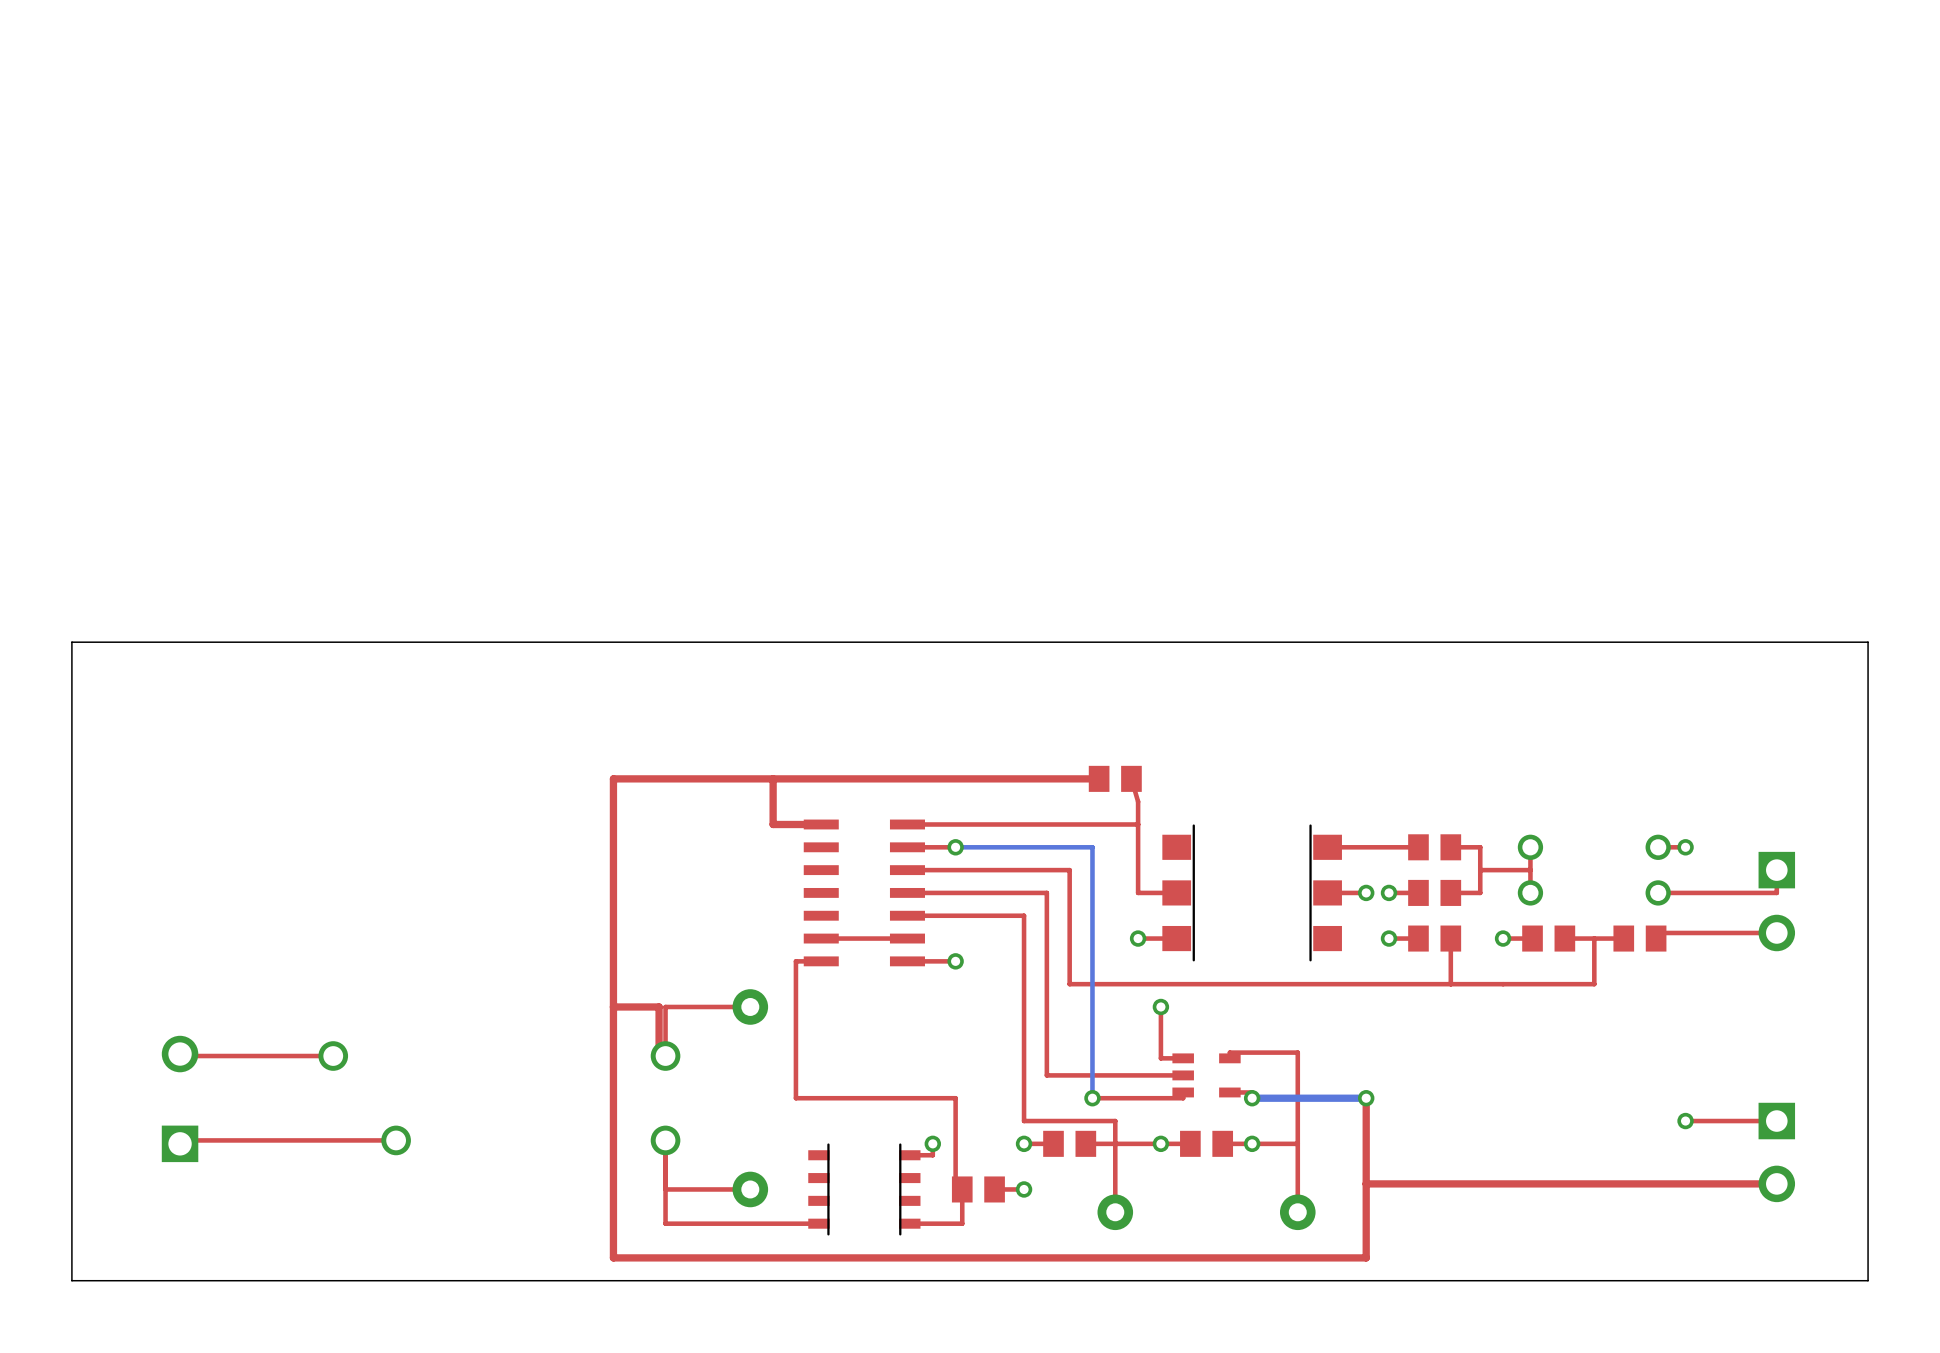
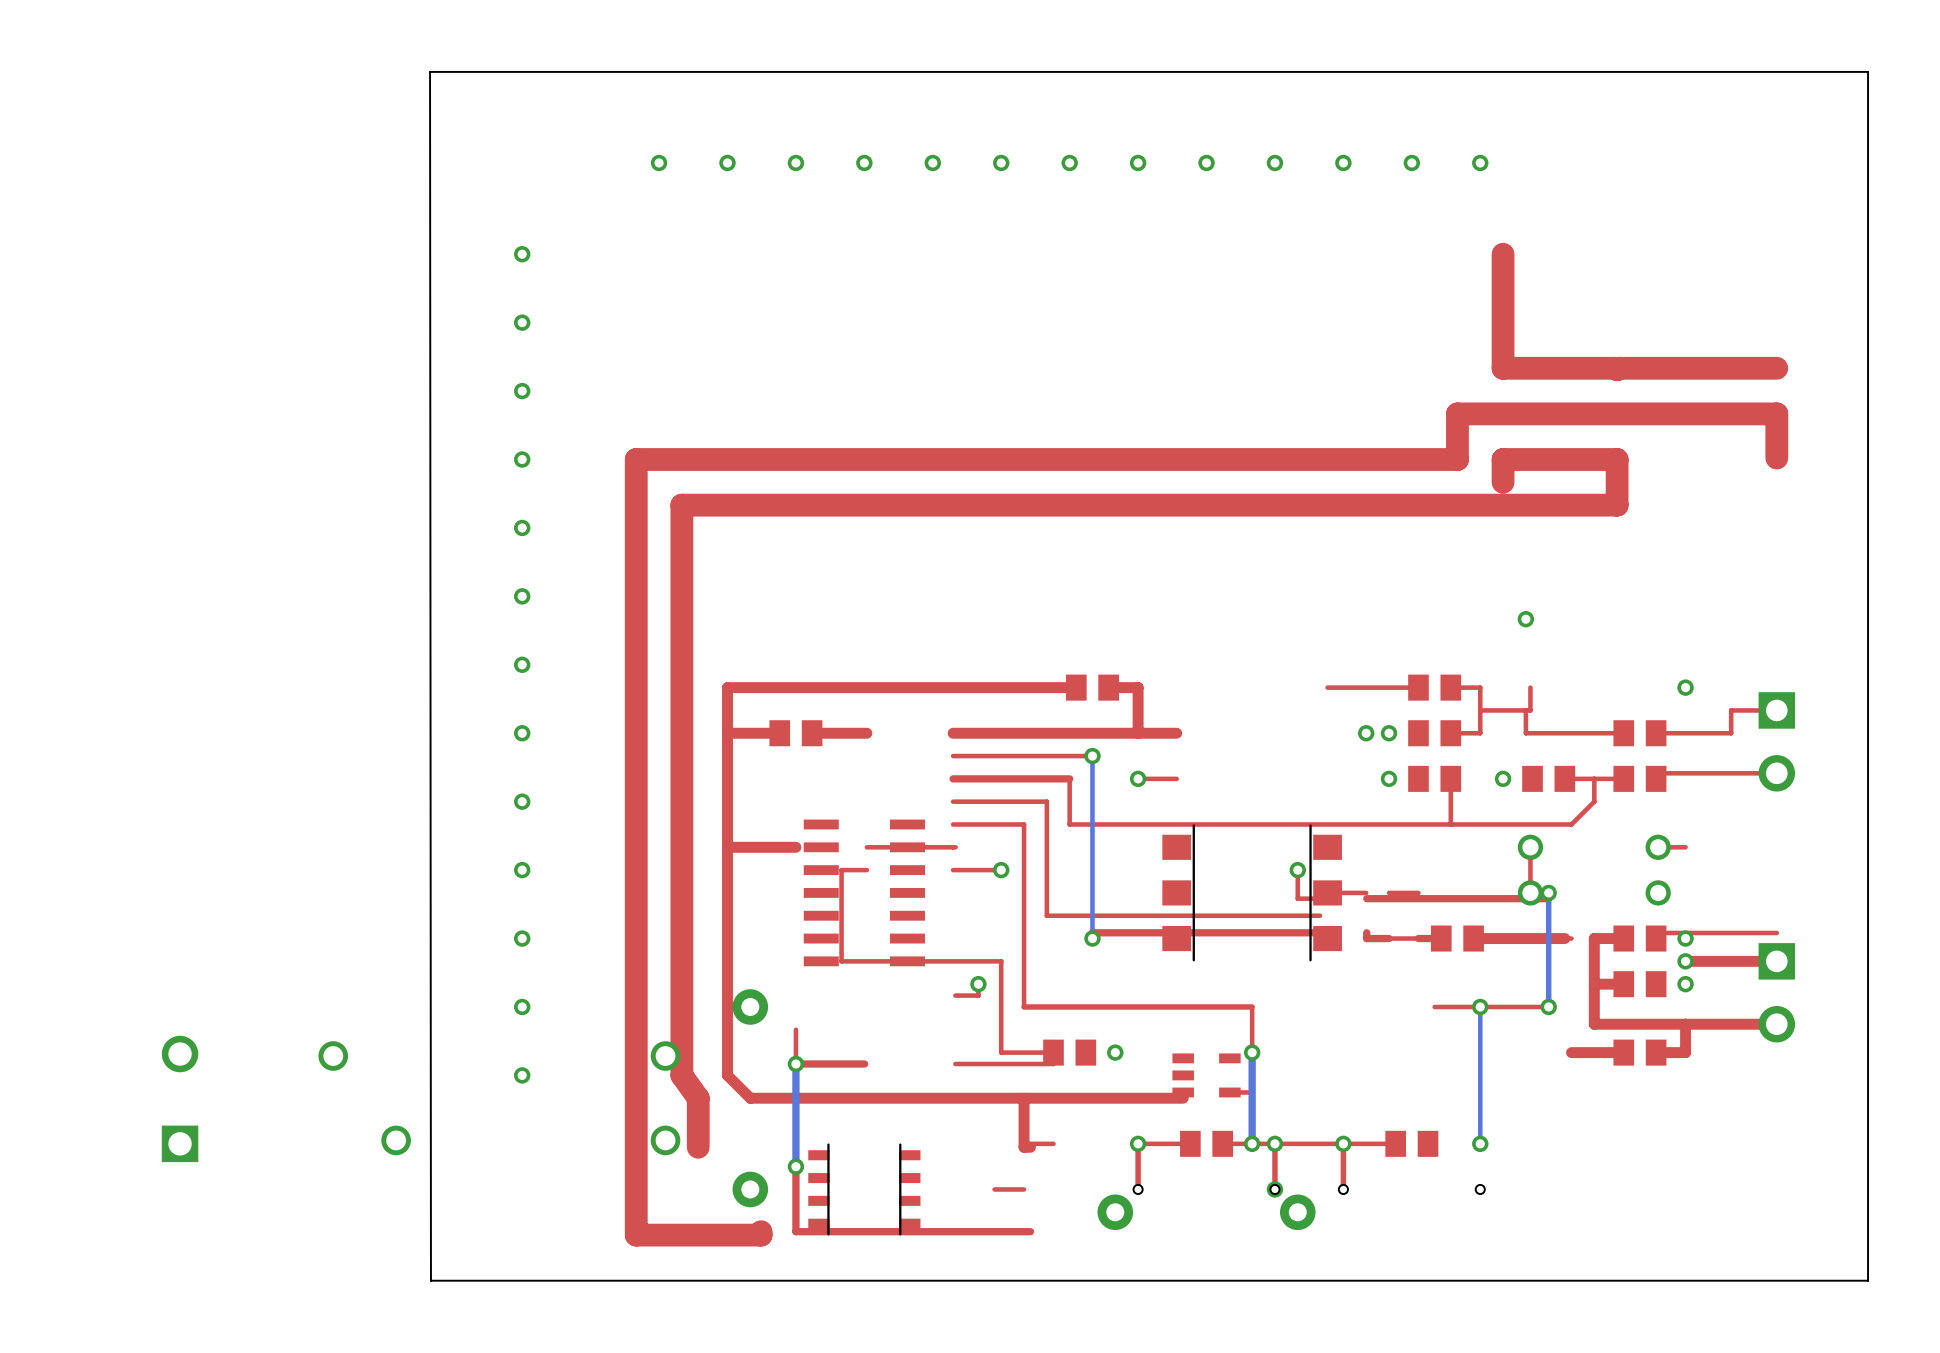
via: none -> (659, 162)
via: none -> (727, 162)
via: none -> (795, 162)
via: none -> (864, 162)
via: none -> (932, 162)
via: none -> (1001, 162)
via: none -> (1069, 162)
via: none -> (1138, 162)
via: none -> (1206, 162)
via: none -> (1274, 162)
via: none -> (1343, 162)
via: none -> (1411, 162)
via: none -> (1480, 162)
via: none -> (522, 254)
top track: none -> (1503, 254) (1503, 368) (1776, 368)
via: none -> (522, 322)
via: none -> (522, 391)
top track: none -> (1776, 458) (1776, 413) (1457, 413) (1457, 459) (636, 459) (636, 1235) (761, 1235) (761, 1231)
via: none -> (522, 459)
top track: none -> (1503, 482) (1503, 459) (1617, 459) (1617, 505) (681, 505) (681, 1075) (698, 1098) (698, 1147)
via: none -> (522, 527)
via: none -> (522, 596)
via: none -> (1525, 619)
board edge: (1868, 642) (71, 642) (71, 1280) (430, 1280) -> (1868, 642) (1868, 71) (430, 71) (430, 1280)
via: none -> (522, 664)
top track: none -> (1076, 687) (727, 687) (727, 1075) (750, 1098) (795, 1098)
top track: none -> (1108, 687) (1138, 687) (1138, 733)
part: none -> (1434, 687)
top track: none -> (1530, 687) (1530, 710) (1480, 710)
via: none -> (1685, 687)
top track: none -> (1525, 710) (1525, 733) (1623, 733)
top track: none -> (1776, 710) (1731, 710) (1731, 733) (1656, 733)
via: none -> (522, 733)
top track: none -> (779, 733) (727, 733)
part: none -> (795, 733)
top track: none -> (866, 733) (812, 733)
top track: none -> (1176, 733) (953, 733)
via: none -> (1366, 733)
via: none -> (1389, 733)
part: none -> (1434, 733)
part: none -> (1639, 733)
part: none -> (1776, 741)
top track: none -> (1092, 756) (953, 756)
via: none -> (1092, 756)
top track: none -> (1776, 773) (1656, 773) (1656, 778)
top track: (773, 778) (773, 824) (821, 824) -> none
top track: (953, 778) (613, 778) (613, 1257) (1366, 1257) (1366, 1098) -> none
top track: (1099, 778) (1069, 778) -> (1069, 824) (1069, 778)
part position: (1115, 778) -> (1092, 687)
top track: (1131, 778) (1138, 801) (1138, 892) (1176, 892) -> none
via: none -> (1138, 778)
via: none -> (1389, 778)
part: none -> (1434, 778)
via: none -> (1503, 778)
part: none -> (1548, 778)
top track: none -> (1594, 778) (1594, 801) (1571, 824) (1138, 824)
top track: none -> (1623, 778) (1564, 778)
part: none -> (1639, 778)
via: none -> (522, 801)
top track: (953, 824) (907, 824) -> none
top track: (1069, 824) (1024, 824) -> (1024, 915) (1024, 824)
top track: none -> (795, 847) (727, 847)
top track: none -> (907, 847) (866, 847)
via: (955, 847) -> none
bottom track: (1092, 847) (955, 847) -> (1092, 847) (1092, 756)
top track: (1418, 847) (1327, 847) -> (1418, 687) (1327, 687)
part: (1434, 847) -> none
top track: (1450, 847) (1480, 847) (1480, 892) (1450, 892) -> (1450, 687) (1480, 687) (1480, 733) (1450, 733)
via: (1685, 847) -> none
via: none -> (522, 870)
top track: none -> (866, 870) (841, 870) (841, 961) (907, 961)
top track: (953, 870) (907, 870) -> none
top track: (1001, 870) (1069, 870) (1069, 984) (1594, 984) -> none
via: none -> (1001, 870)
top track: none -> (1297, 870) (1297, 898) (1320, 898)
via: none -> (1297, 870)
top track: (1530, 870) (1480, 870) -> none
top track: (1776, 870) (1776, 892) (1658, 892) -> none
top track: (1046, 892) (907, 892) -> (1046, 892) (1046, 801) (953, 801)
via: (1366, 892) -> none
via: (1389, 892) -> none
part: (1434, 892) -> none
top track: none -> (1548, 892) (1548, 898) (1366, 898)
bottom track: none -> (1548, 892) (1548, 1006)
via: none -> (1548, 892)
part: (1776, 901) -> none
top track: (1024, 915) (907, 915) -> none
top track: (1046, 915) (1046, 1075) (1183, 1075) -> (1046, 915) (1320, 915)
top track: none -> (1320, 932) (1092, 932) (1092, 938)
top track: none -> (1366, 932) (1366, 938) (1389, 938)
via: none -> (522, 938)
top track: (907, 938) (821, 938) -> none
bottom track: (1092, 938) (1092, 1098) -> none
via position: (1138, 938) -> (1092, 938)
top track: (1176, 938) (1138, 938) -> (1176, 778) (1138, 778)
via: (1389, 938) -> none
part position: (1434, 938) -> (1457, 938)
top track: (1450, 938) (1450, 984) -> (1450, 778) (1450, 824)
top track: none -> (1503, 938) (1473, 938)
via: (1503, 938) -> none
top track width: thin (1525, 938) (1503, 938) -> thick (1525, 938) (1503, 938)
part: (1548, 938) -> none
top track: none -> (1564, 938) (1525, 938)
top track: (1594, 938) (1571, 938) -> (1441, 938) (1418, 938)
top track width: thin (1623, 938) (1594, 938) (1594, 984) -> thick (1623, 938) (1594, 938) (1594, 984)
via: none -> (1685, 938)
top track: (821, 961) (795, 961) (795, 1029) -> none
top track: none -> (955, 961) (1001, 961) (1001, 1052) (1053, 1052) (1053, 1064) (955, 1064)
via position: (955, 961) -> (978, 984)
via: none -> (1685, 961)
top track: none -> (1623, 984) (1594, 984) (1594, 1024) (1776, 1024)
part: none -> (1639, 984)
via: none -> (1685, 984)
part: none -> (1776, 992)
via: none -> (522, 1006)
top track: (613, 1006) (659, 1006) (659, 1052) -> none
top track: (750, 1006) (665, 1006) (665, 1056) (659, 1056) -> none
top track: (1024, 1006) (1024, 1098) -> (1024, 1006) (1252, 1006) (1252, 1052)
top track: (1160, 1006) (1160, 1058) (1183, 1058) -> none
via: (1160, 1006) -> none
bottom track: none -> (1480, 1006) (1480, 1143)
via: none -> (1480, 1006)
top track: none -> (1548, 1006) (1434, 1006)
via: none -> (1548, 1006)
top track: none -> (1685, 1024) (1685, 1052) (1656, 1052)
part: none -> (1069, 1052)
via: none -> (1115, 1052)
bottom track: none -> (1252, 1052) (1252, 1143)
via: none -> (1252, 1052)
top track: none -> (1623, 1052) (1571, 1052)
part: none -> (1639, 1052)
top track: (180, 1054) (182, 1056) (333, 1056) -> none
top track: (1229, 1058) (1229, 1052) (1297, 1052) (1297, 1212) -> none
top track: (795, 1064) (795, 1098) -> (795, 1064) (864, 1064)
bottom track: none -> (795, 1064) (795, 1166)
via: none -> (795, 1064)
via: none -> (522, 1075)
top track: (955, 1098) (955, 1189) (962, 1189) (962, 1223) (909, 1223) -> (955, 1098) (1092, 1098)
top track width: thin (955, 1098) (795, 1098) -> thick (955, 1098) (795, 1098)
top track width: thin (1024, 1098) (1024, 1121) -> thick (1024, 1098) (1024, 1121)
via: (1092, 1098) -> none
top track width: thin (1183, 1098) (1092, 1098) -> thick (1183, 1098) (1092, 1098)
via: (1252, 1098) -> none
bottom track: (1366, 1098) (1252, 1098) -> none
via: (1366, 1098) -> none
top track: (1024, 1121) (1115, 1121) (1115, 1212) -> (1024, 1121) (1024, 1147) (1030, 1147)
via: (1685, 1121) -> none
top track: (1776, 1121) (1685, 1121) -> (1776, 961) (1685, 961)
top track: (396, 1140) (183, 1140) (180, 1143) -> none
top track: (665, 1140) (665, 1223) (818, 1223) -> none
top track: (932, 1143) (932, 1155) (909, 1155) -> (978, 984) (978, 995) (955, 995)
via: (932, 1143) -> none
via: (1024, 1143) -> none
part: (1069, 1143) -> none
top track: (1138, 1143) (1085, 1143) -> (1138, 1143) (1138, 1189)
via position: (1160, 1143) -> (1138, 1143)
top track: none -> (1274, 1143) (1274, 1189)
via: none -> (1274, 1143)
top track: none -> (1343, 1143) (1343, 1189)
via: none -> (1343, 1143)
top track: none -> (1395, 1143) (1297, 1143)
part: none -> (1411, 1143)
via: none -> (1480, 1143)
part: (1776, 1152) -> none
top track: none -> (795, 1166) (795, 1231) (1030, 1231)
via: none -> (795, 1166)
top track: (1776, 1183) (1366, 1183) -> none
top track: (750, 1189) (665, 1189) -> none
part: (978, 1189) -> none
via: (1024, 1189) -> none
hole: none -> (1138, 1189)
via: none -> (1274, 1189)
hole: none -> (1274, 1189)
hole: none -> (1343, 1189)
hole: none -> (1480, 1189)

